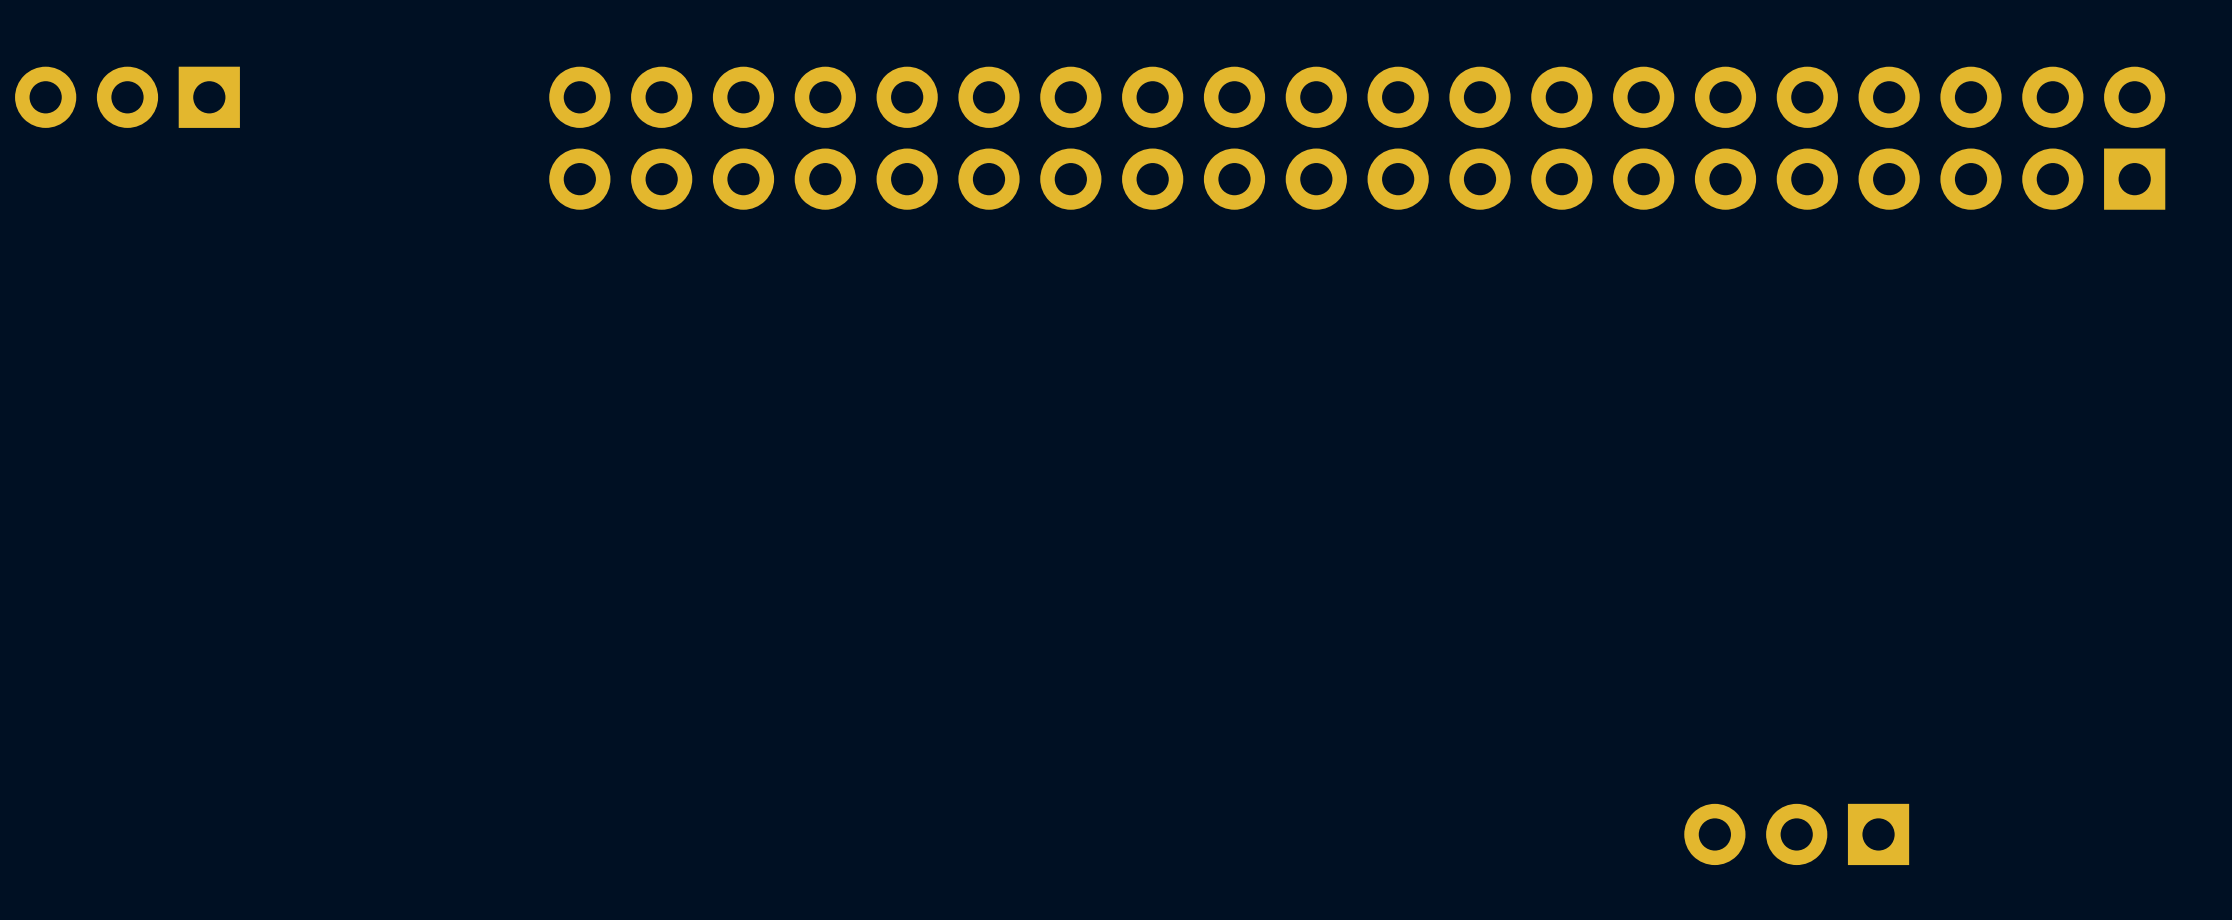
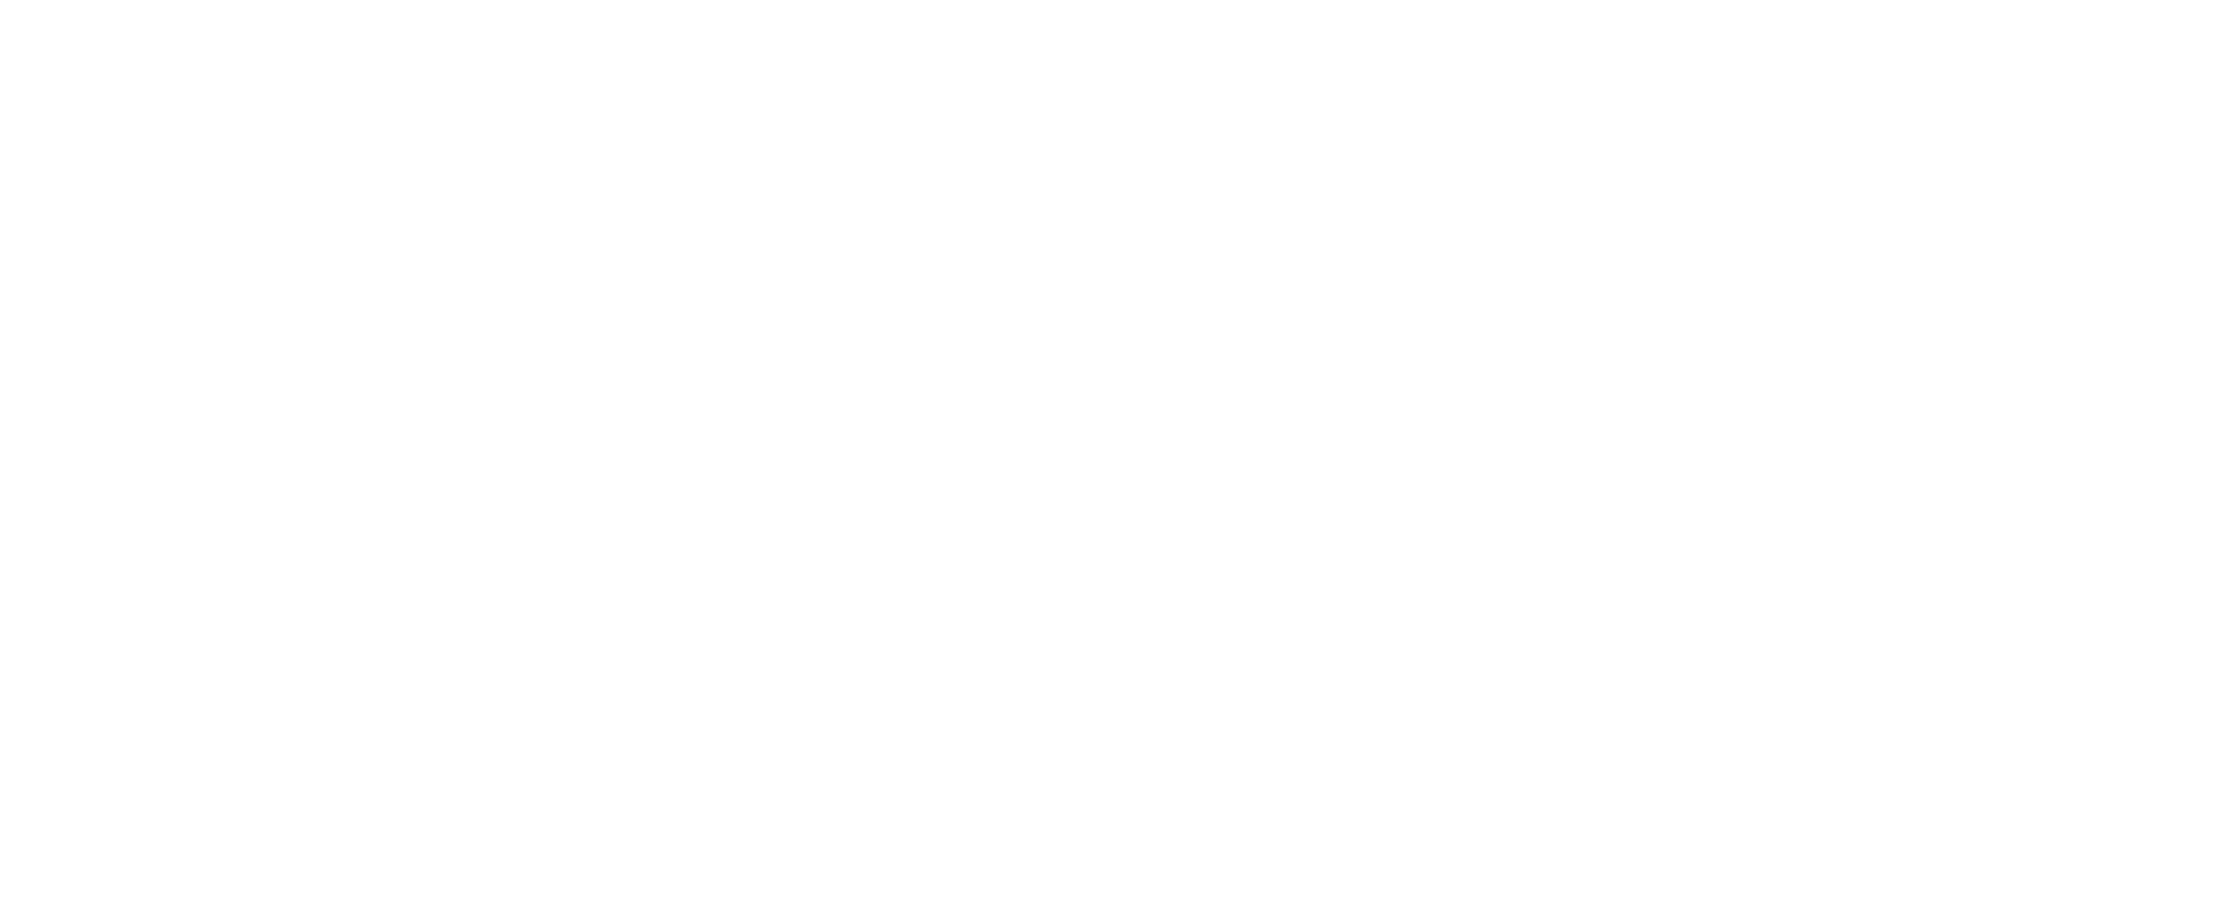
part: (127, 97) -> none
part: (1357, 138) -> none
part: (1796, 834) -> none

